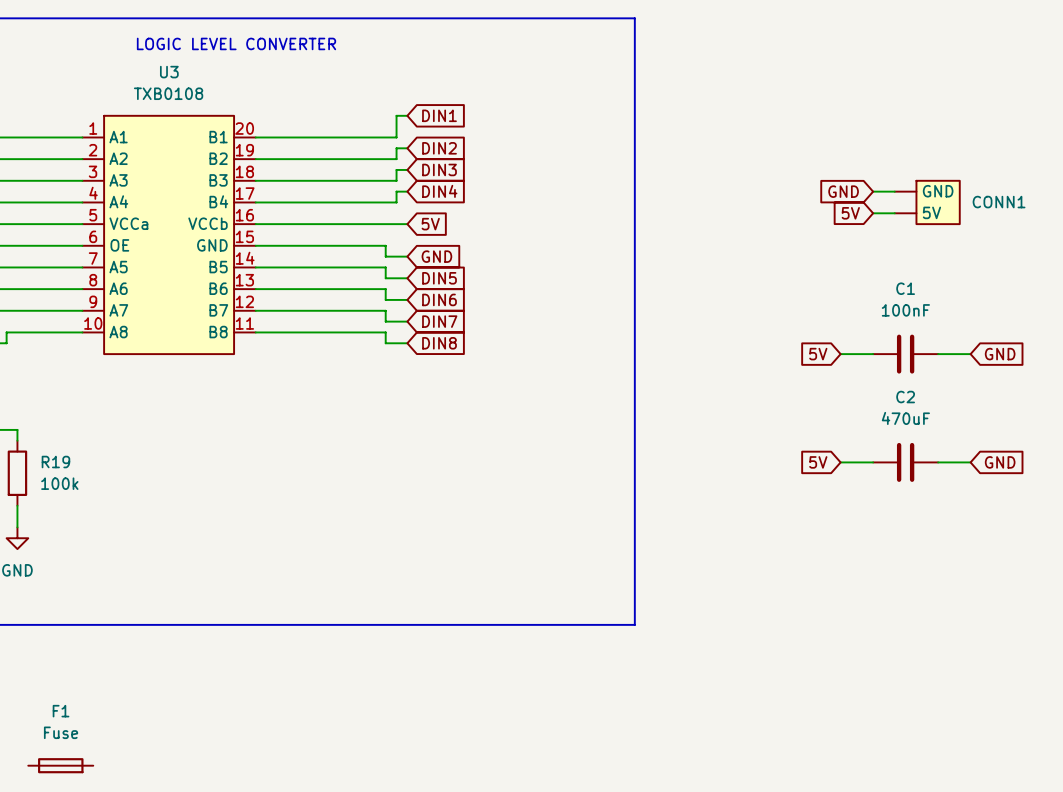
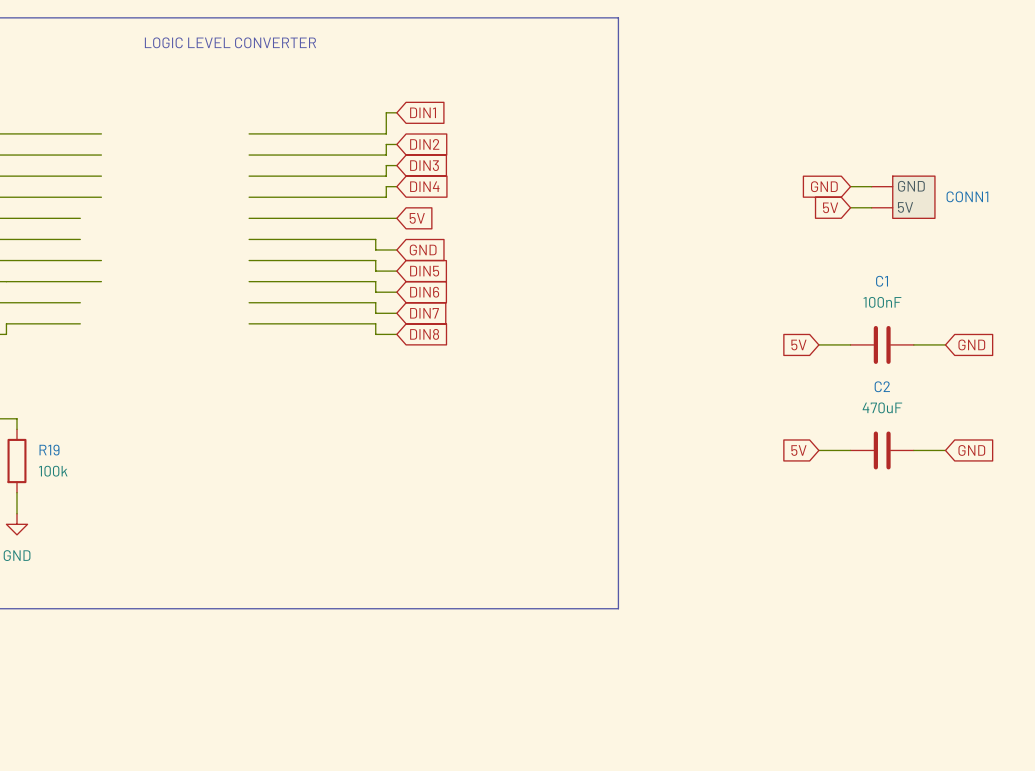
U3: TXB0108 (169, 234) -> none
F1: Fuse (60, 765) -> none

